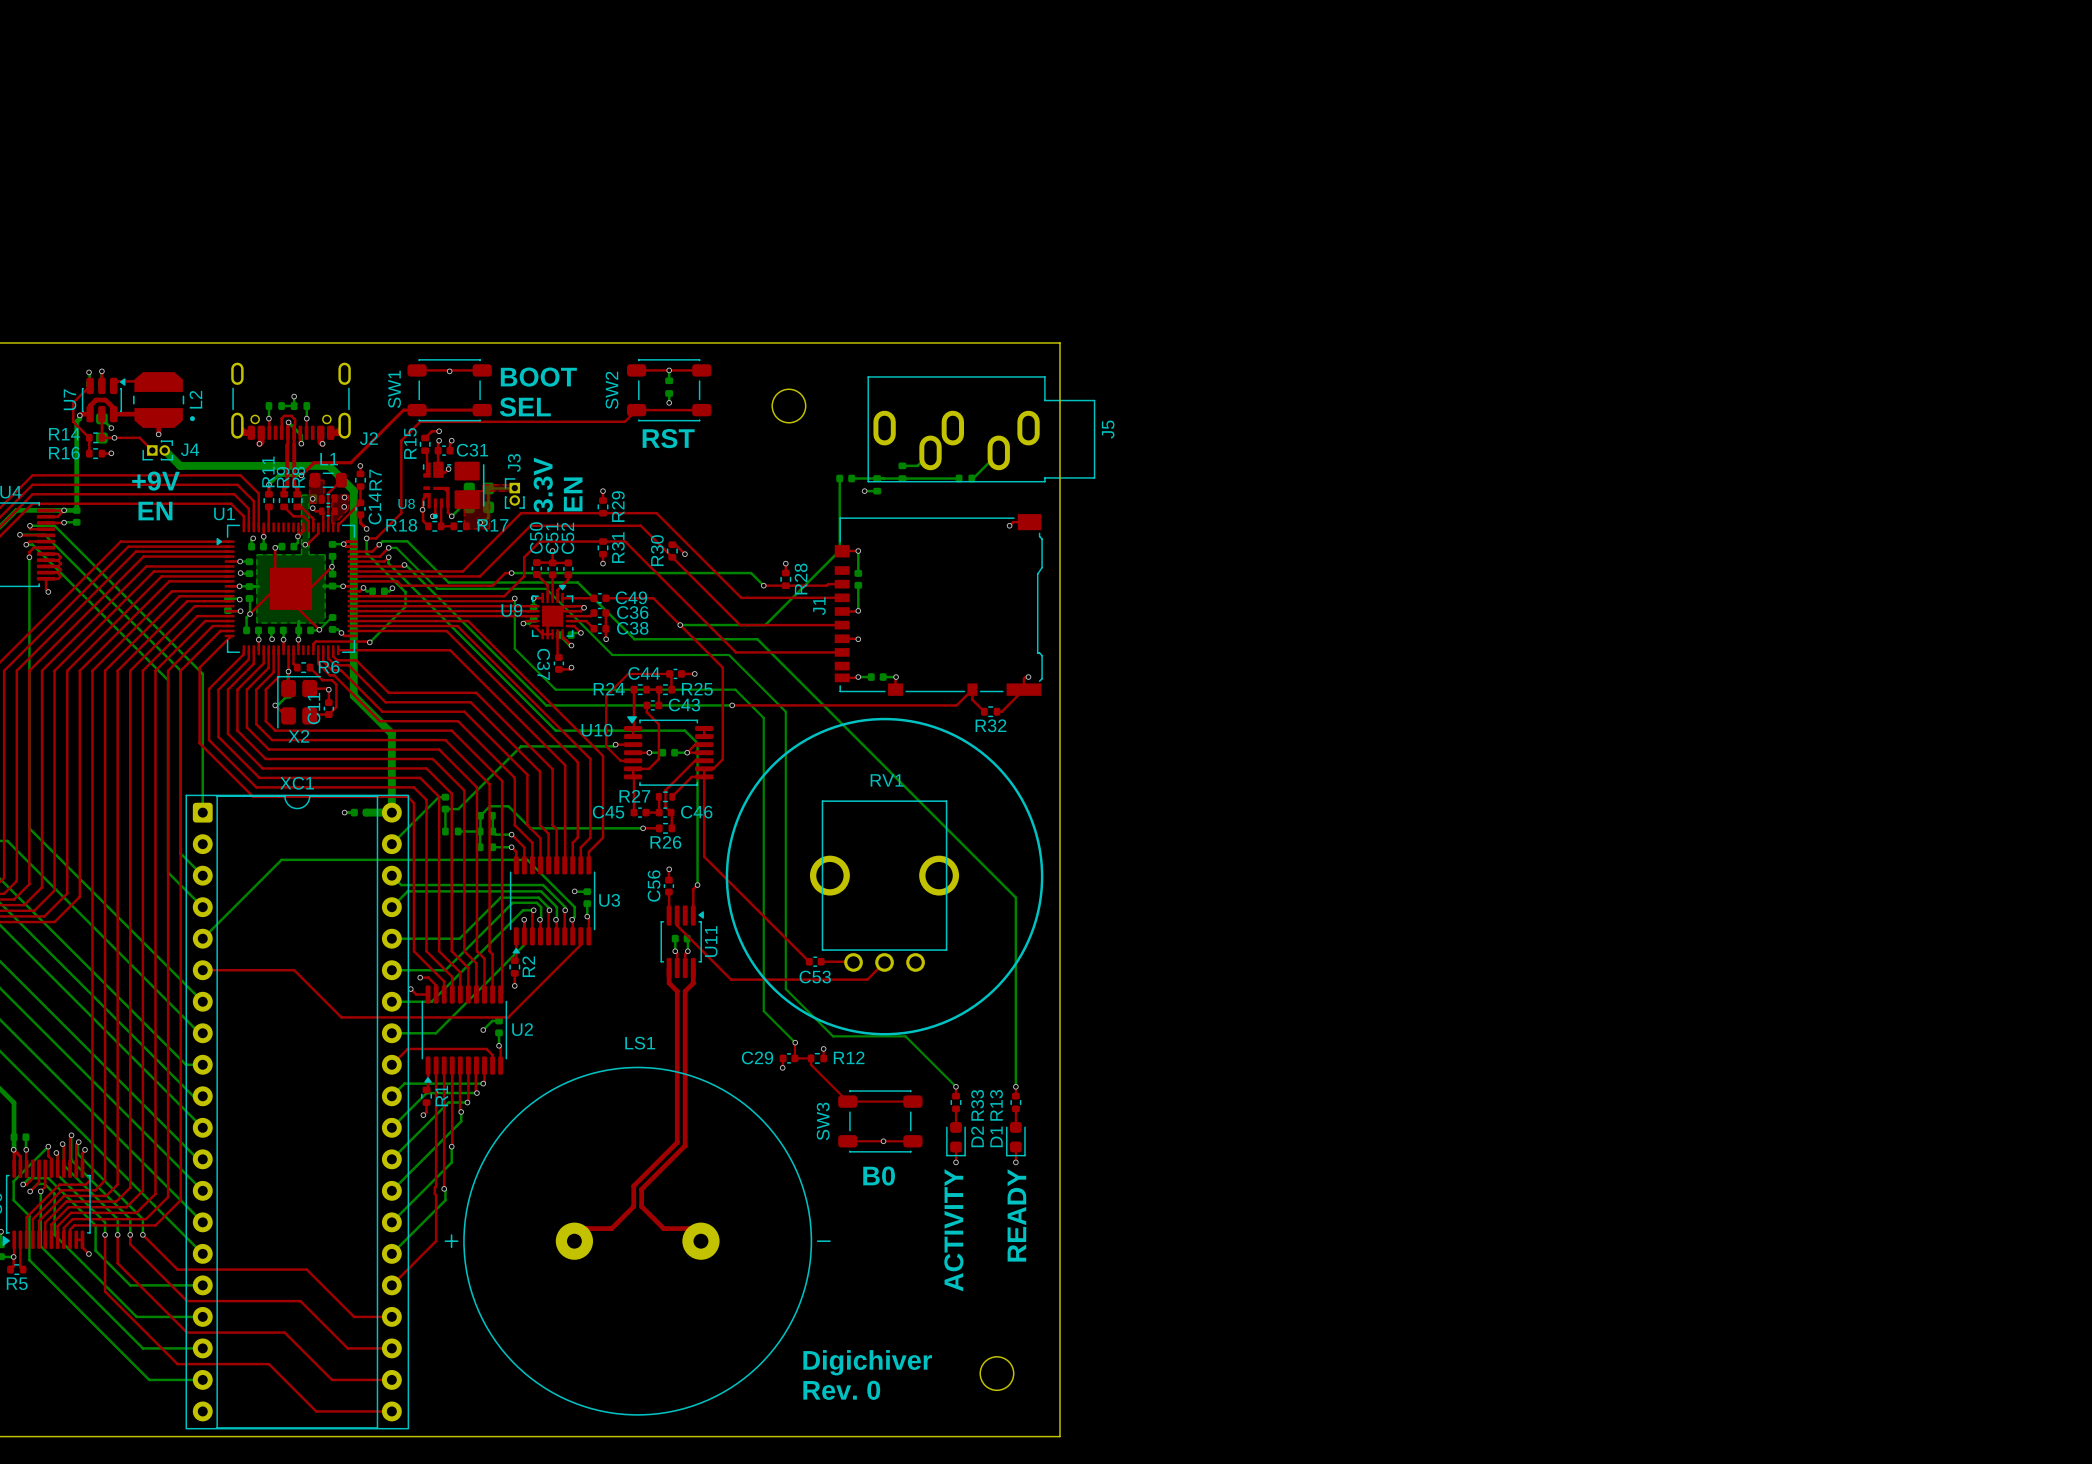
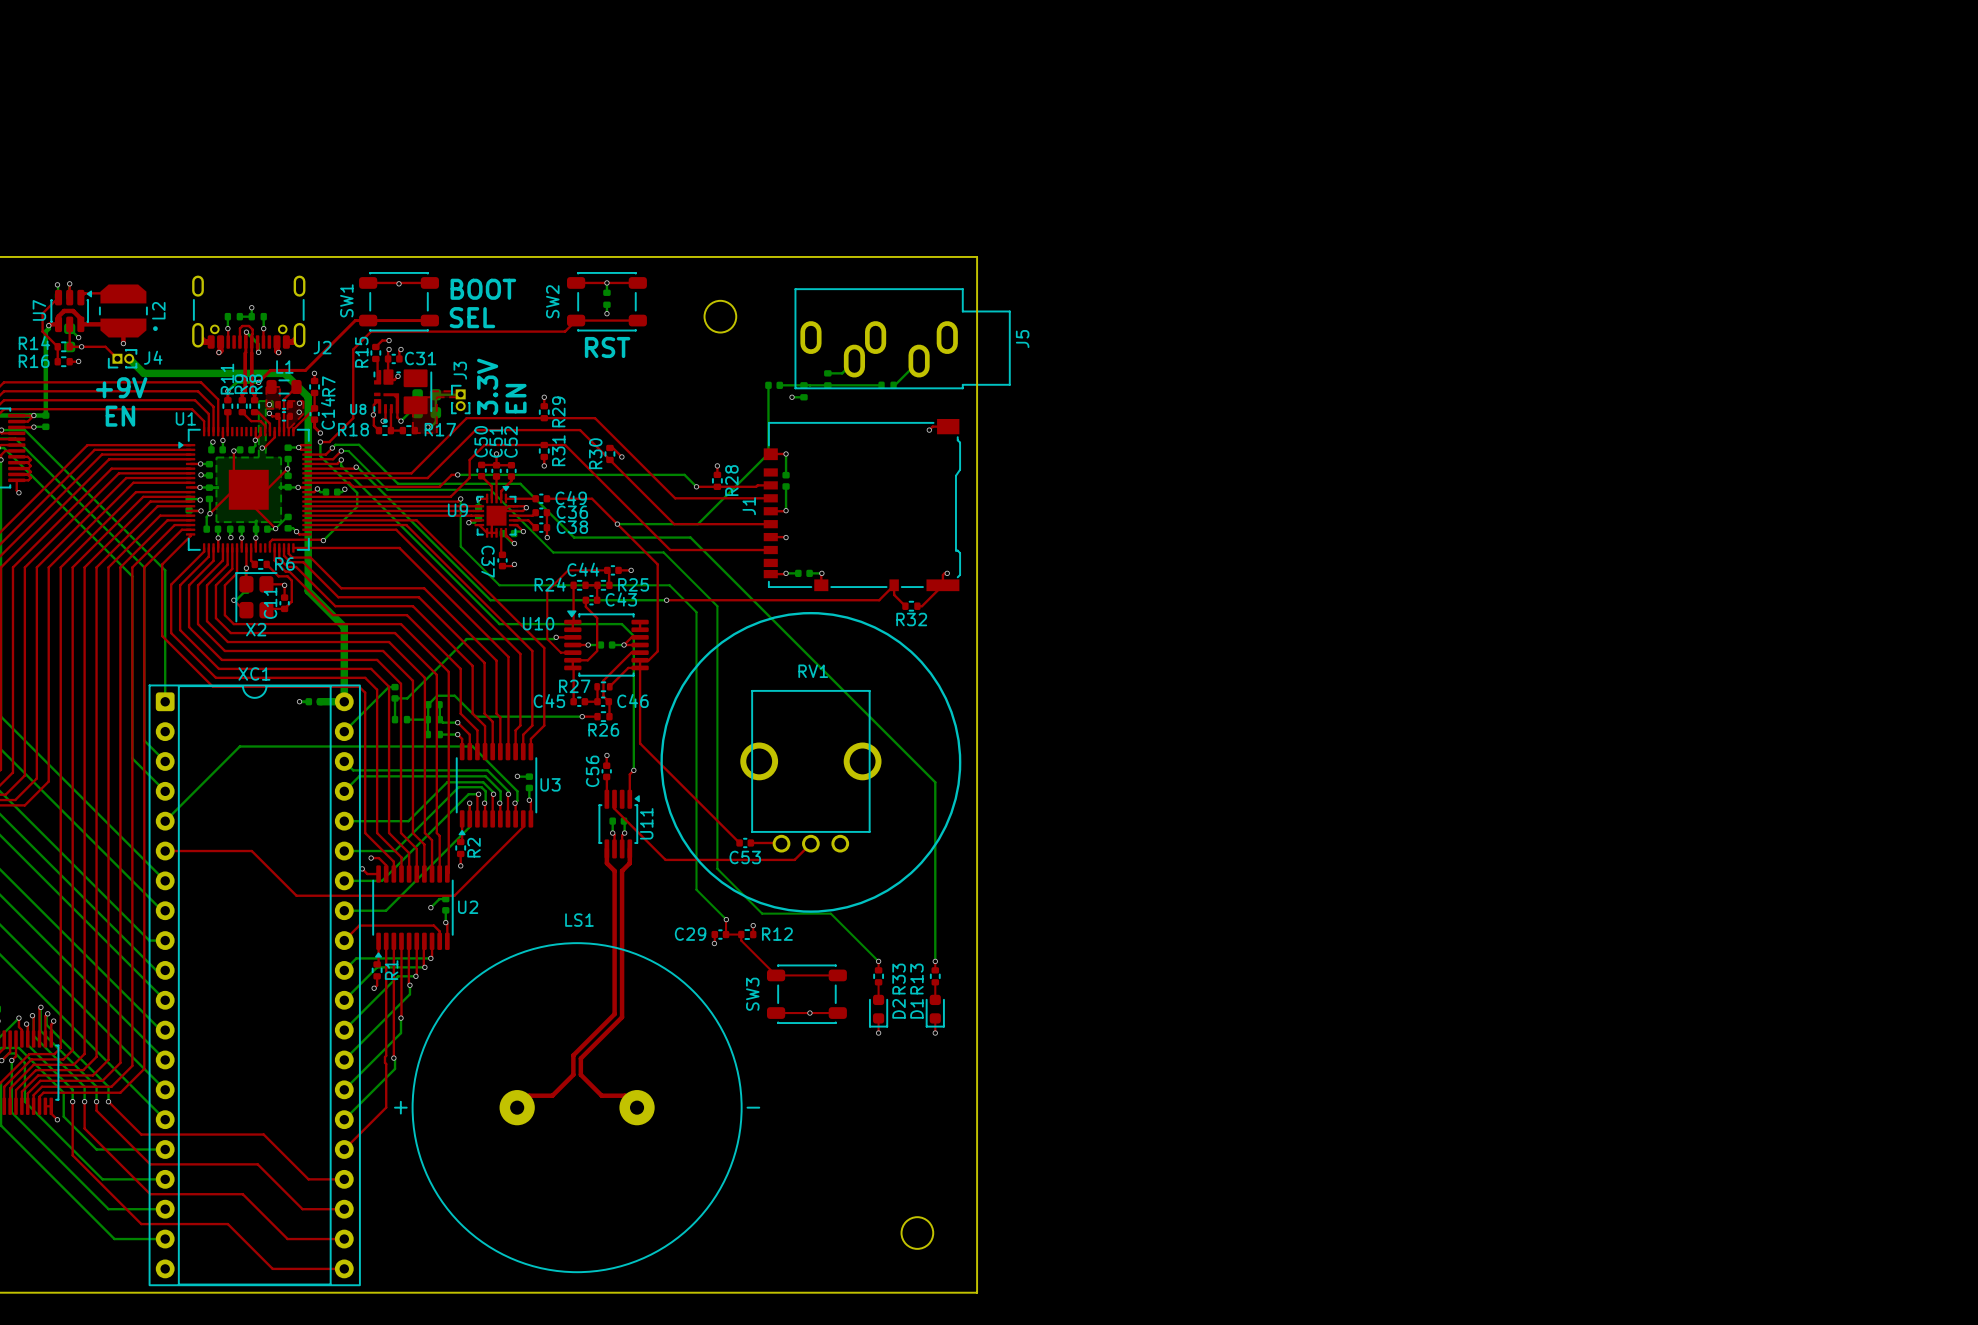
text: B0 (879, 1176) -> none
text: READY (1016, 1215) -> none
text: ACTIVITY (953, 1230) -> none
text: Digichiver (867, 1362) -> none
text: Rev. 0 (841, 1390) -> none

